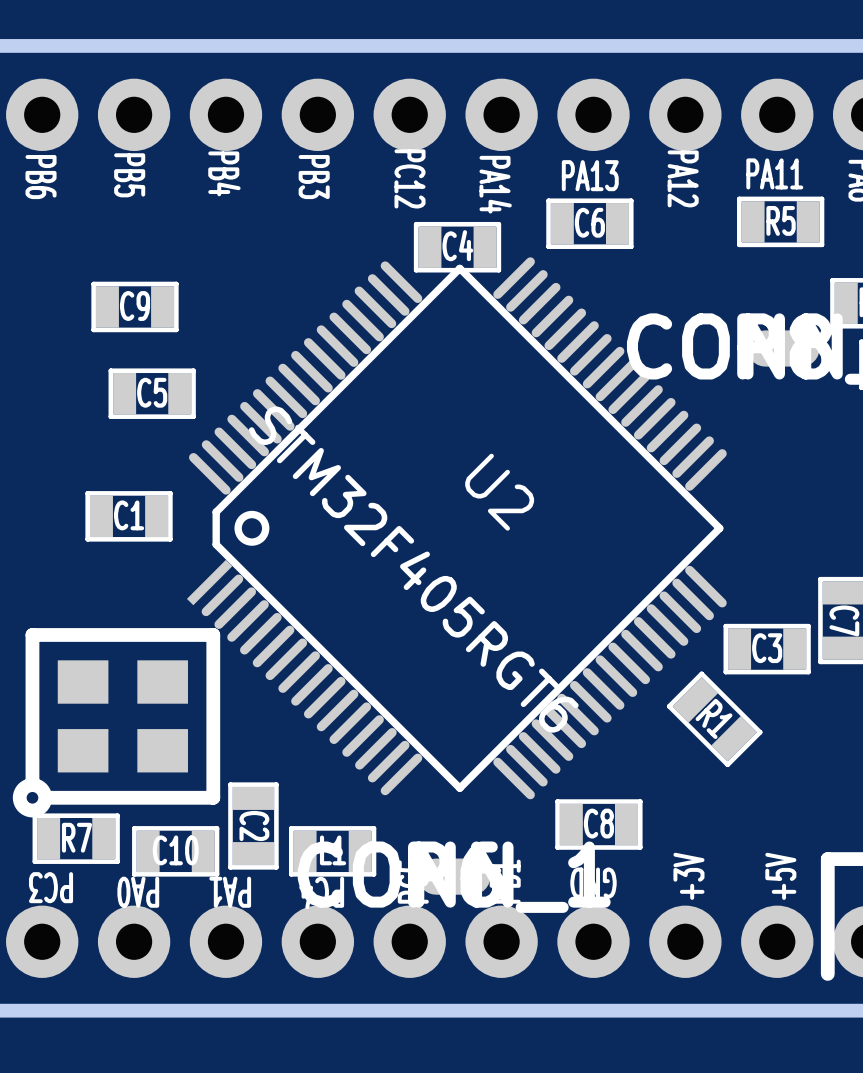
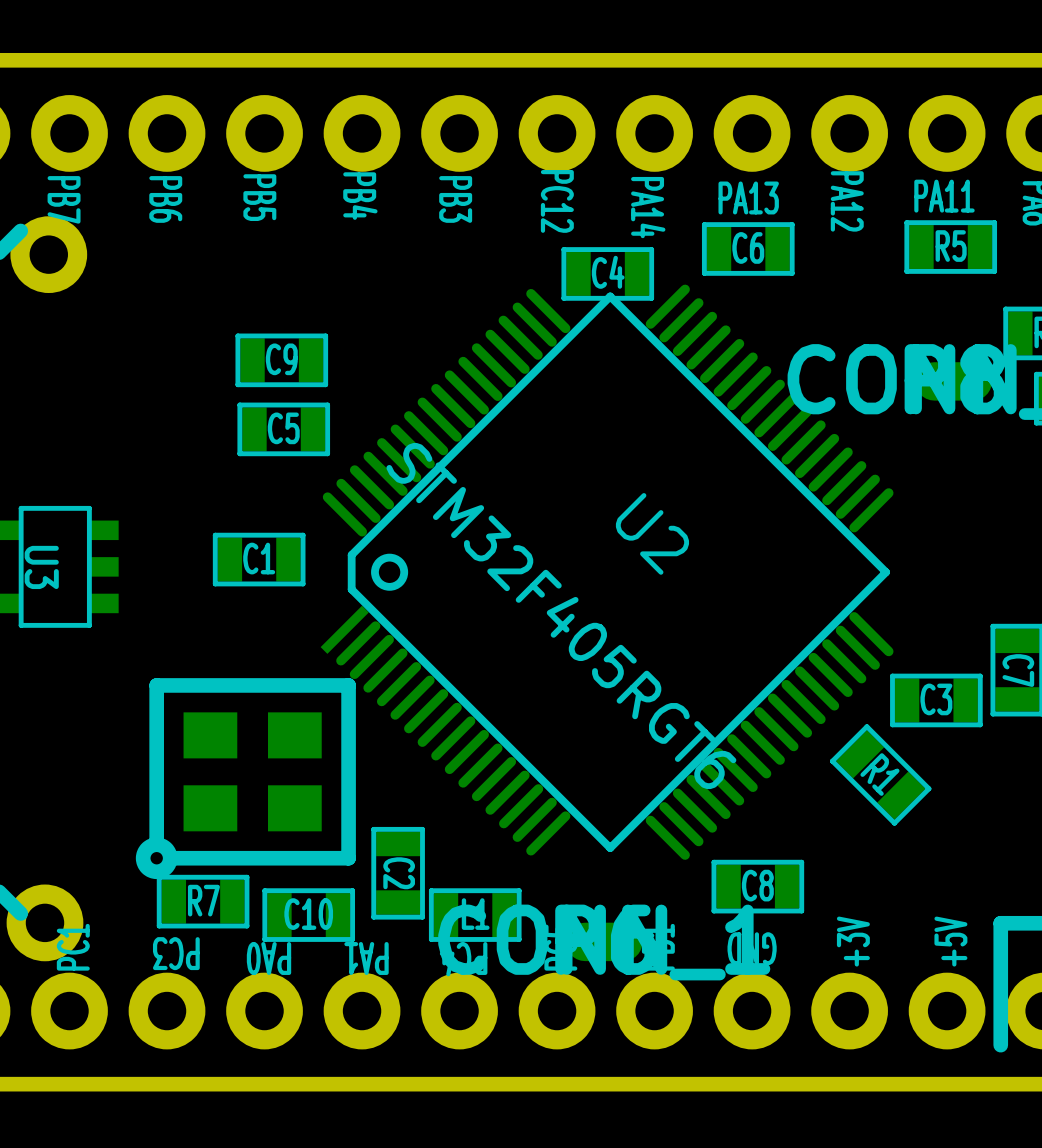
C9 position: (135, 306) -> (281, 360)
C2 position: (253, 826) -> (398, 873)

